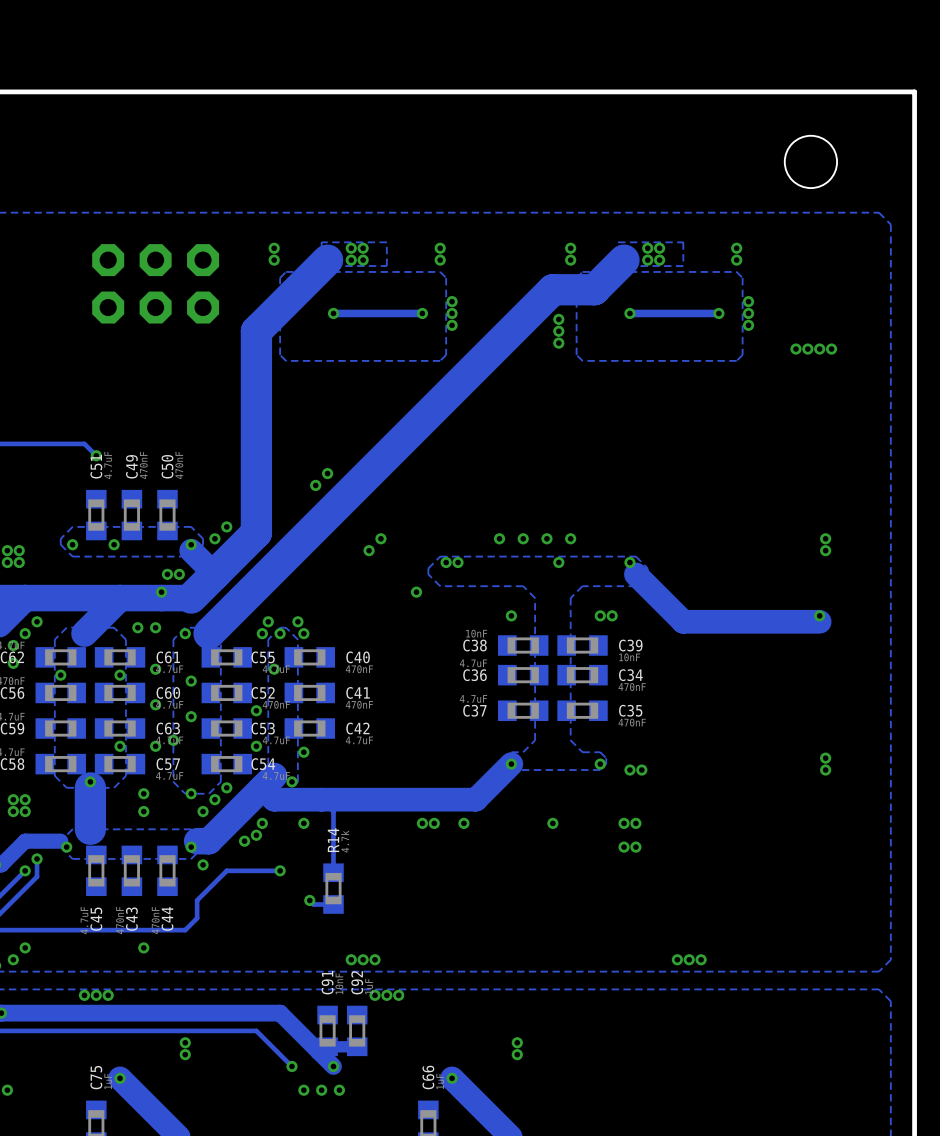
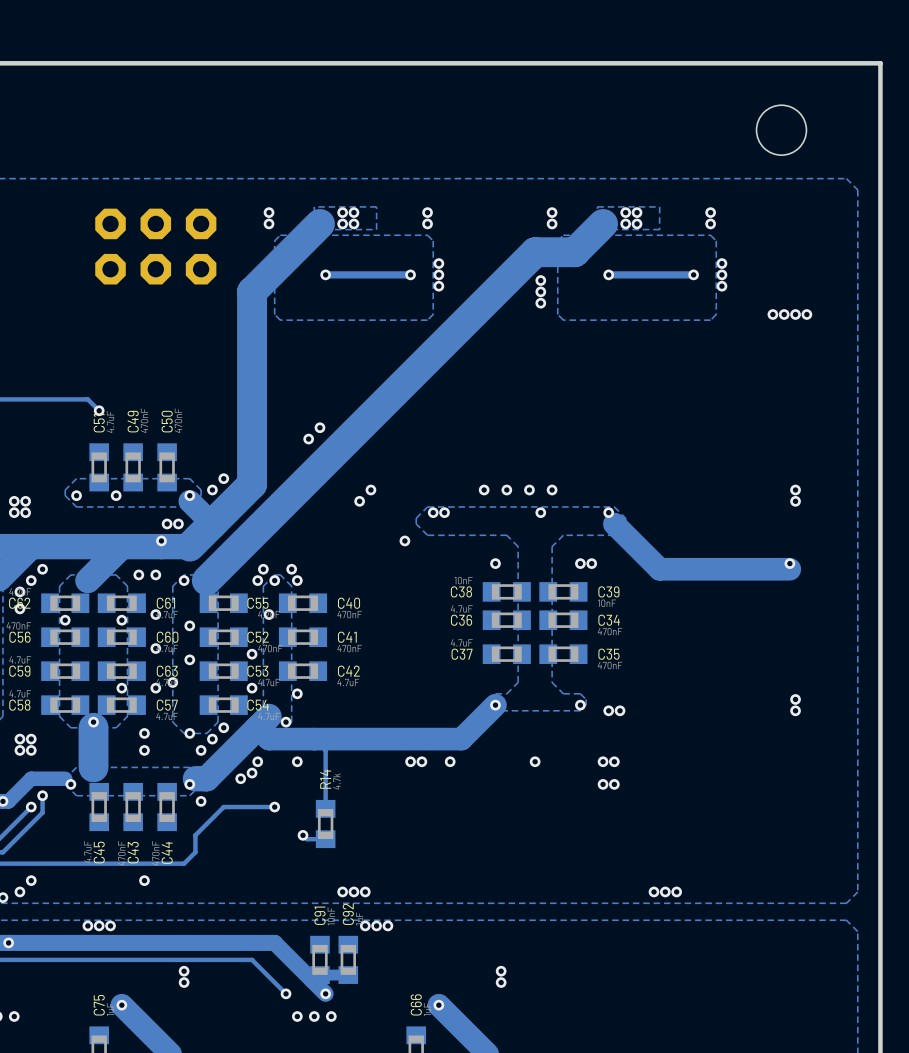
via: (795, 349) -> none
via: (807, 349) -> none
via: (819, 349) -> none
via: (831, 349) -> none
via: none -> (772, 314)
via: none -> (784, 314)
via: none -> (795, 314)
via: none -> (806, 314)

